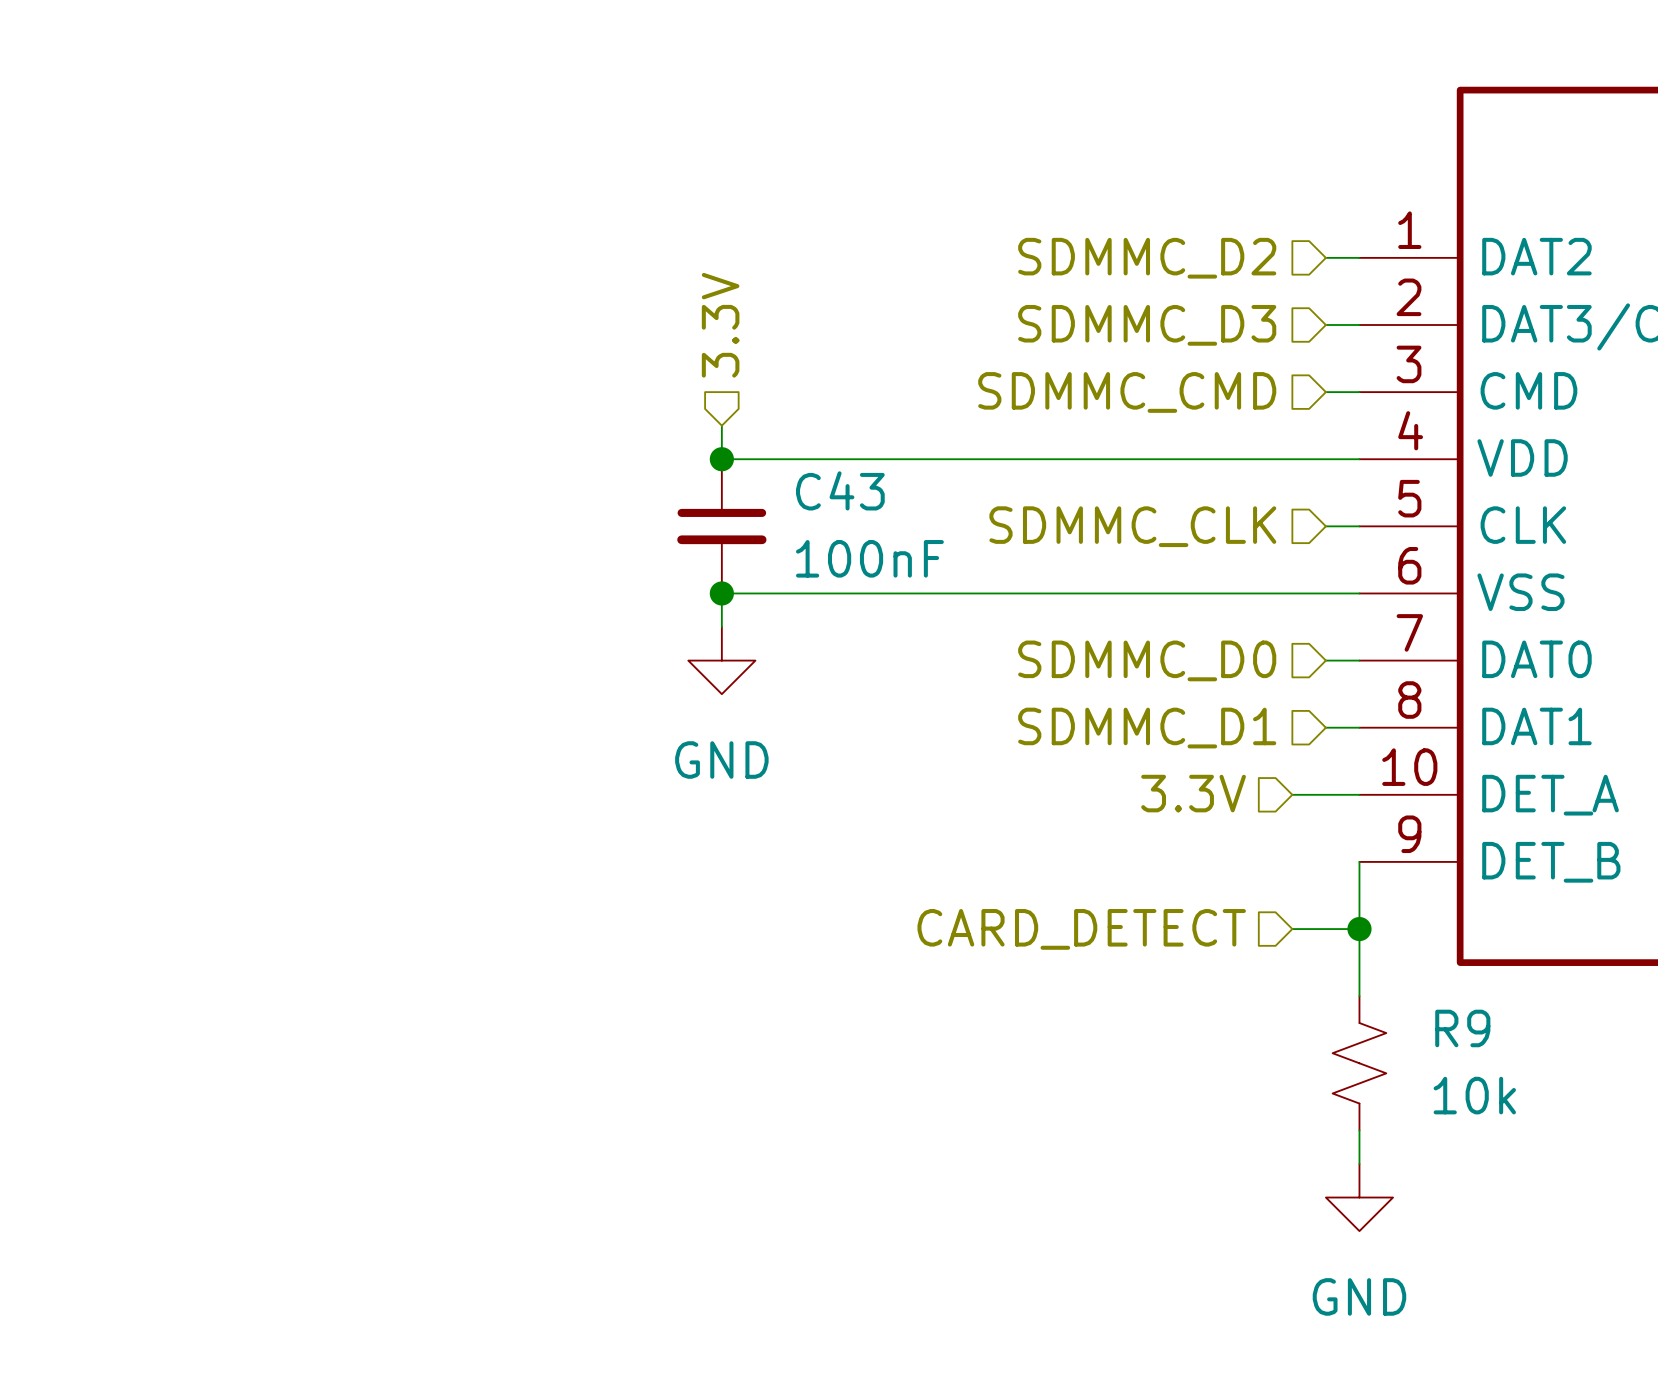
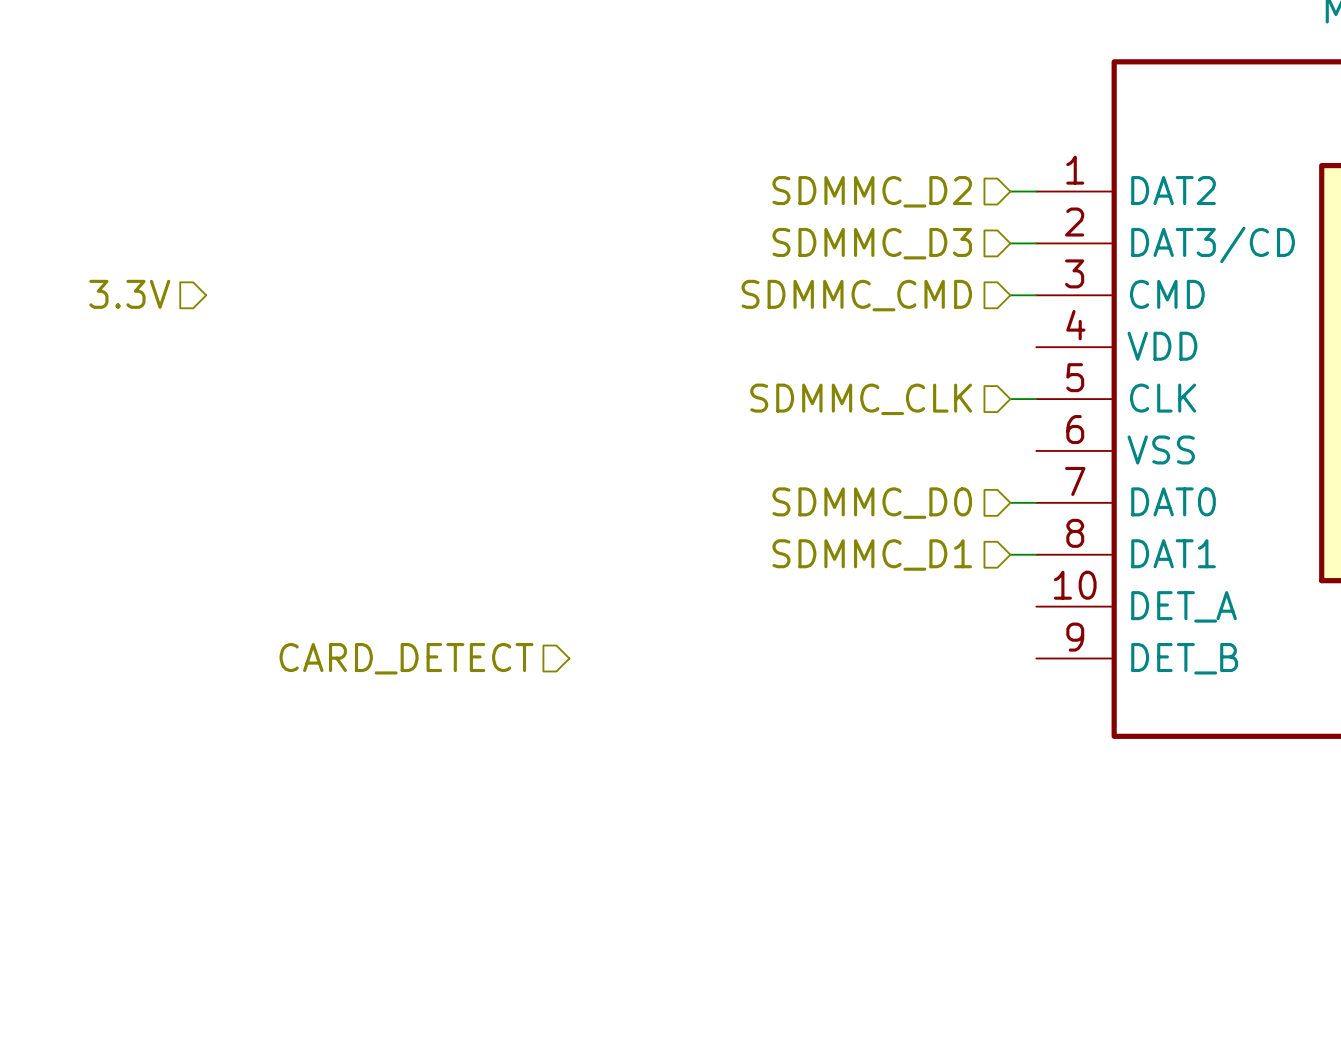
hierarchical label rotation: 0° (720, 325) -> 90° counterclockwise (129, 294)
hierarchical label position: 3.3V (720, 325) -> 3.3V (129, 294)
wire: (721, 425) (721, 459) (1359, 459) -> none
junction: (721, 459) -> none
C43: 100nF (721, 526) -> none
junction: (721, 593) -> none
wire: (1359, 593) (721, 593) (721, 627) -> none
power symbol: GND (721, 660) -> none
hierarchical label: 3.3V (1193, 793) -> none
wire: (1292, 794) (1359, 794) -> none
wire: (1359, 861) (1359, 996) -> none
hierarchical label position: CARD_DETECT (1081, 929) -> CARD_DETECT (406, 658)
wire: (1292, 929) (1359, 929) -> none
junction: (1359, 929) -> none
R9: 10k (1359, 1063) -> none
wire: (1359, 1130) (1359, 1163) -> none
power symbol: GND (1359, 1197) -> none

